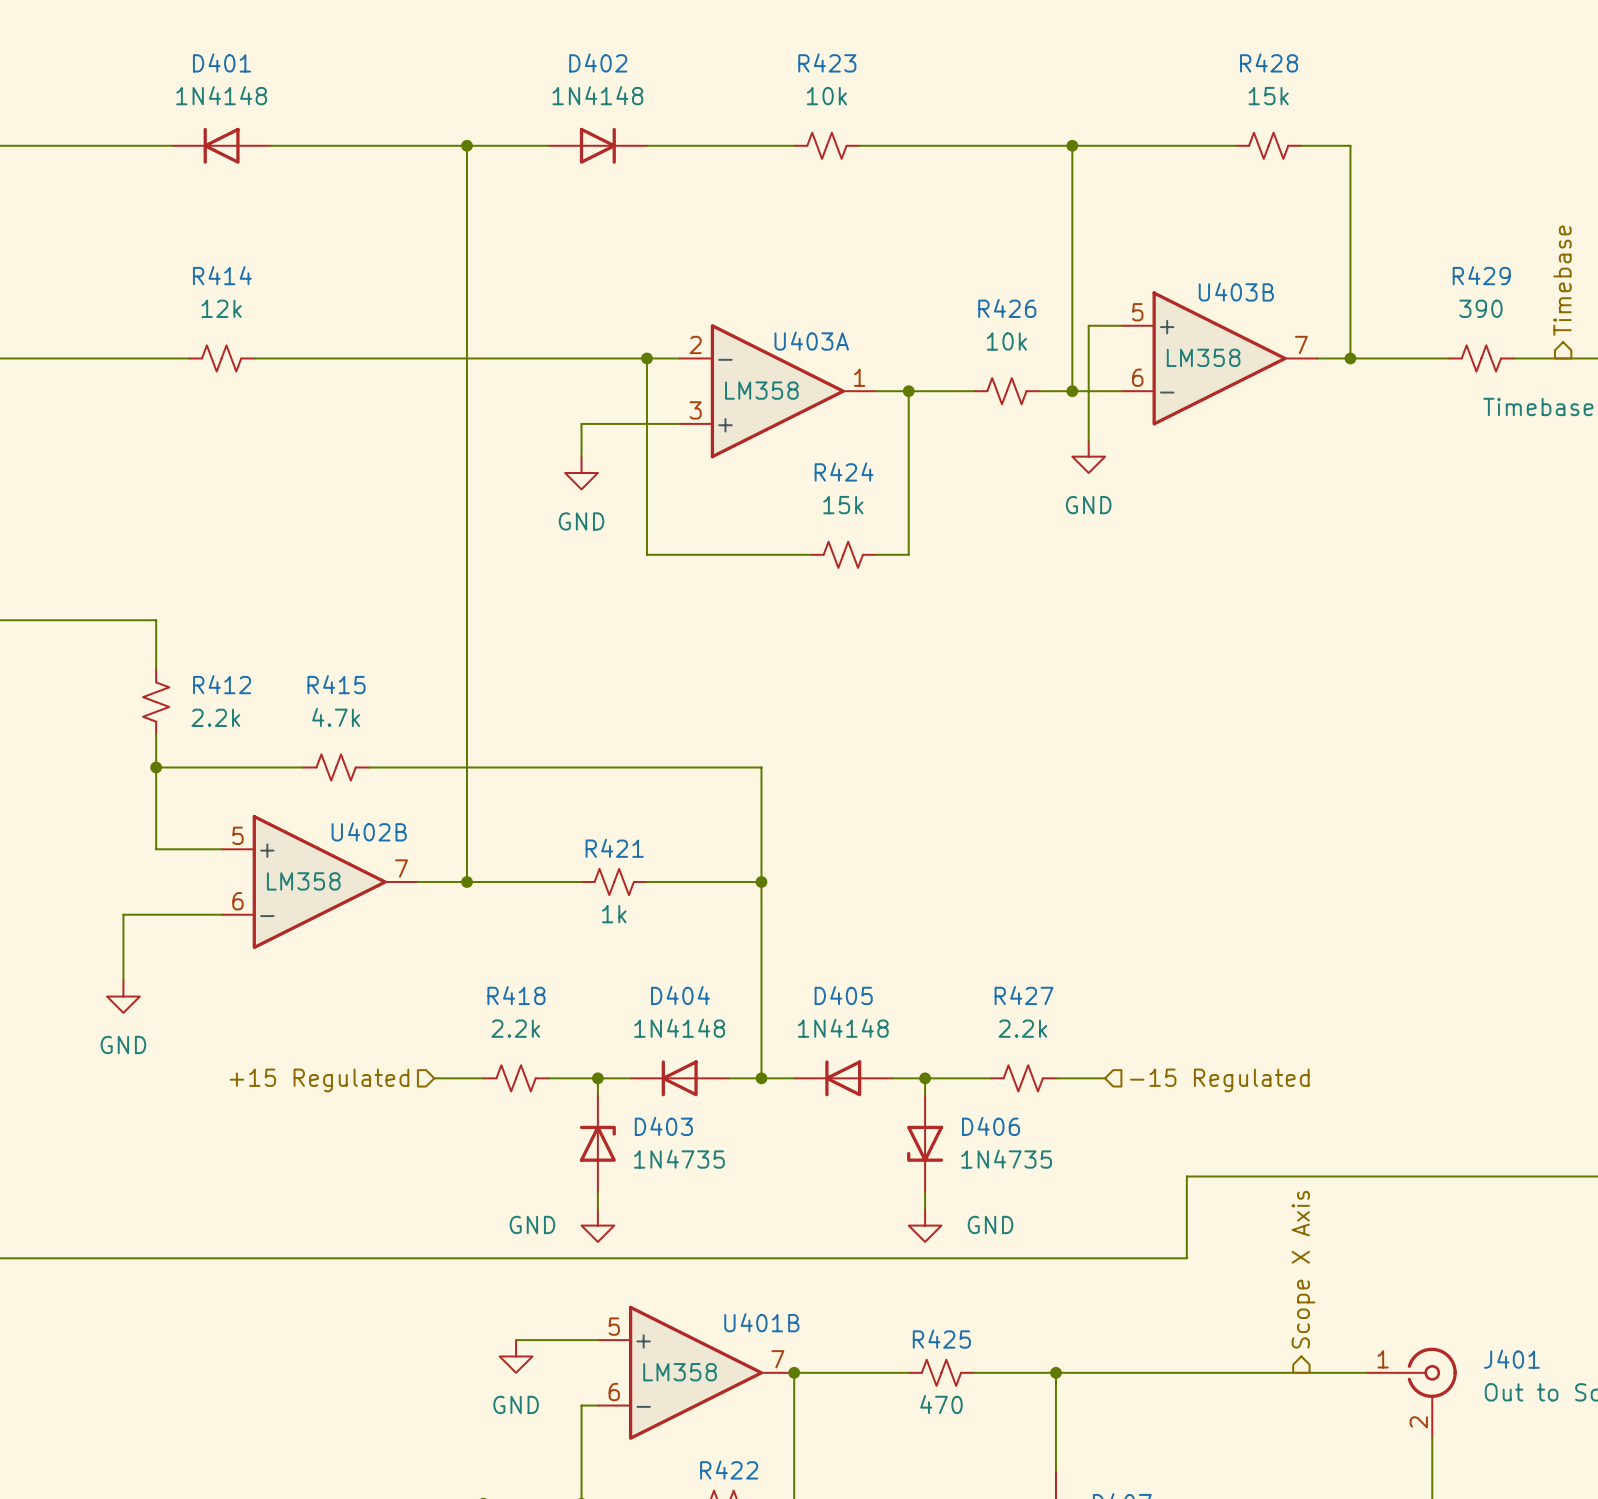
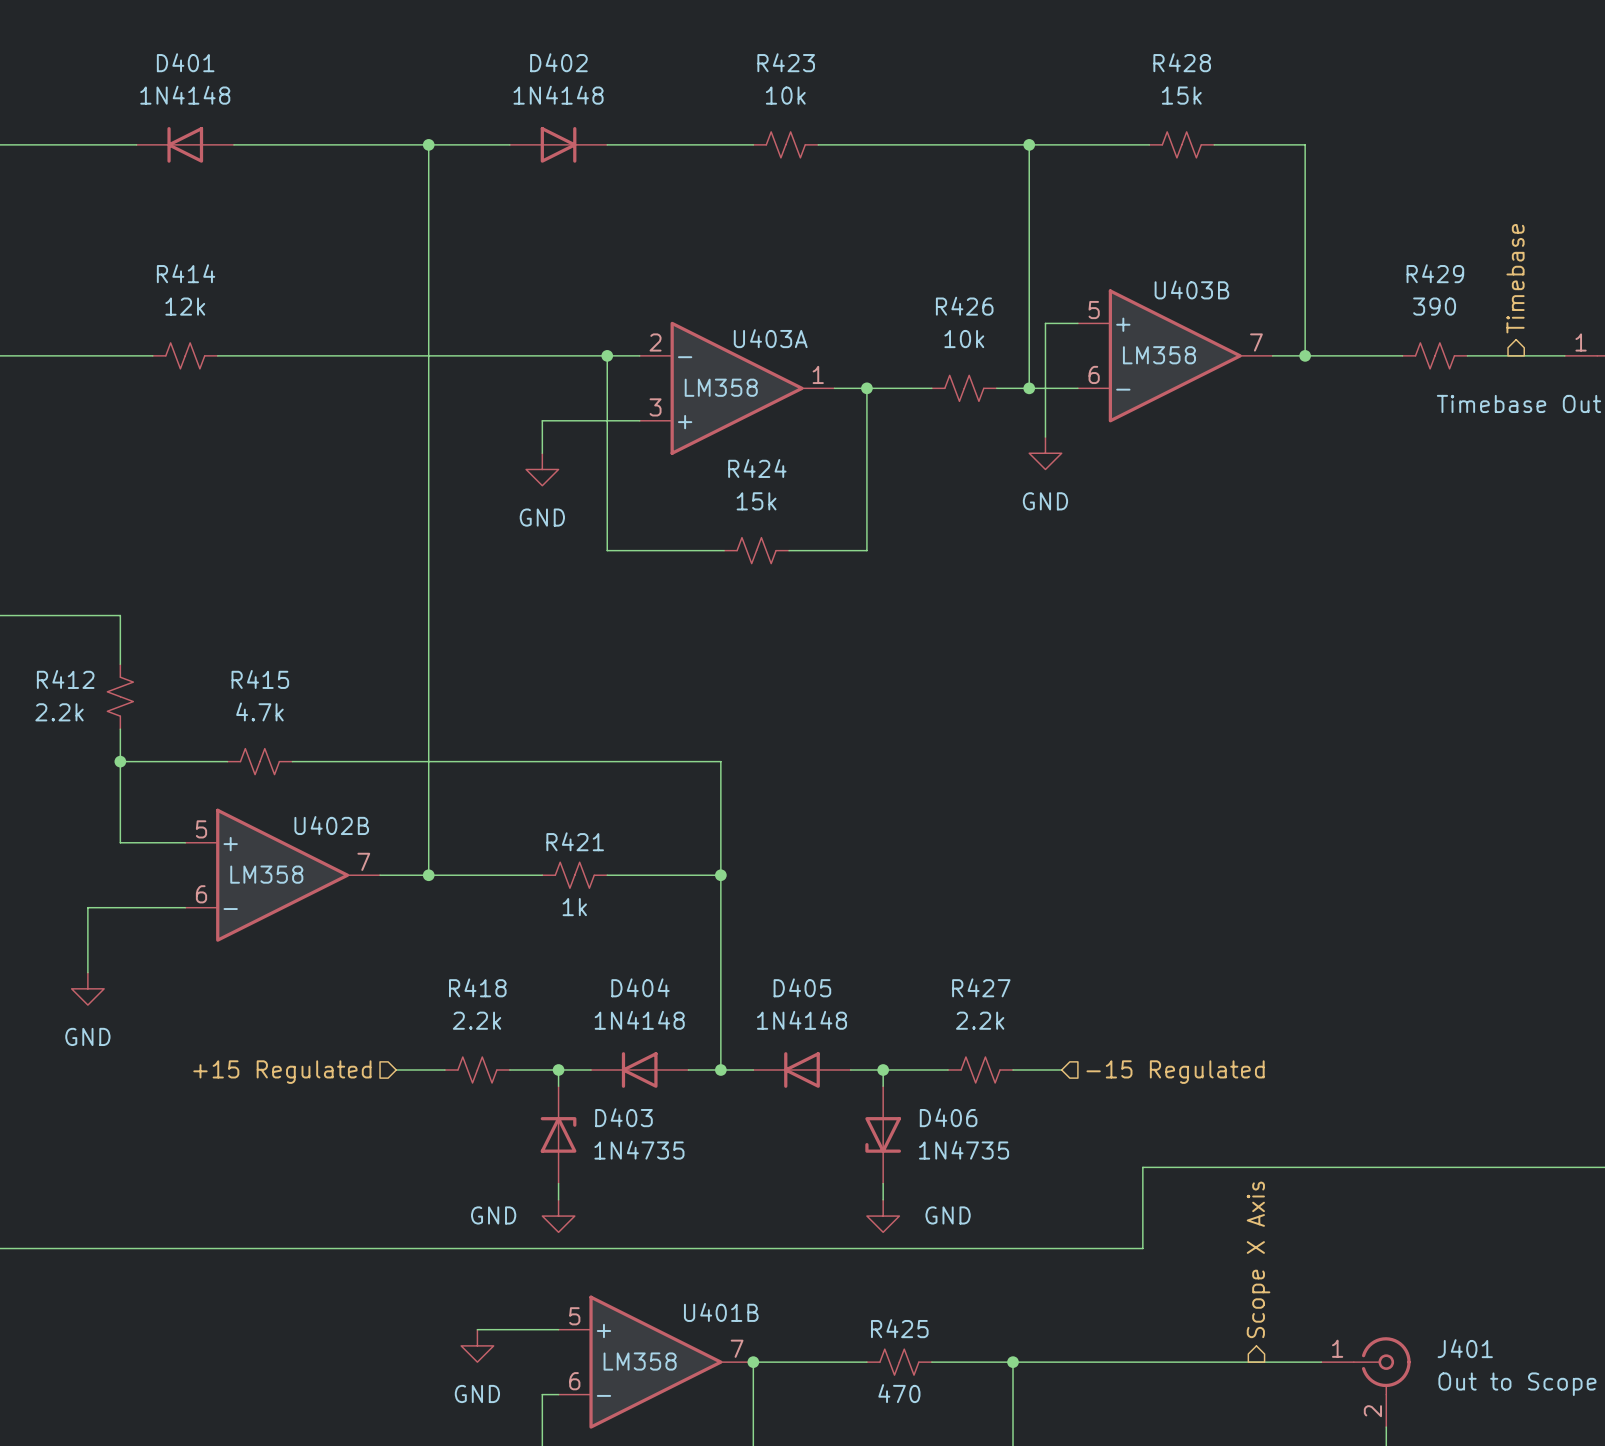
wire: (1193, 145) (1235, 145) -> (1214, 144) (1256, 144)
R428 position: (1268, 145) -> (1181, 144)
wire: (764, 554) (810, 554) -> (789, 550) (834, 550)
R424 position: (843, 554) -> (756, 550)
R412 name position: R412 (222, 684) -> R412 (65, 679)
R412 value position: 2.2k (215, 717) -> 2.2k (59, 712)
wire: (264, 767) (303, 767) -> (292, 761) (331, 761)
R415 position: (336, 767) -> (259, 761)

